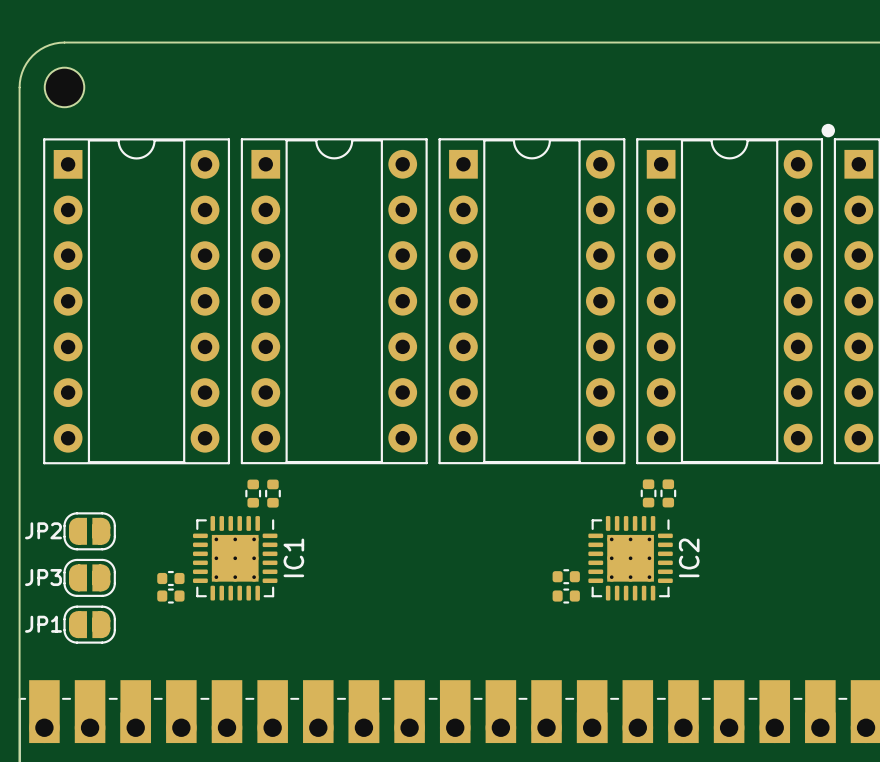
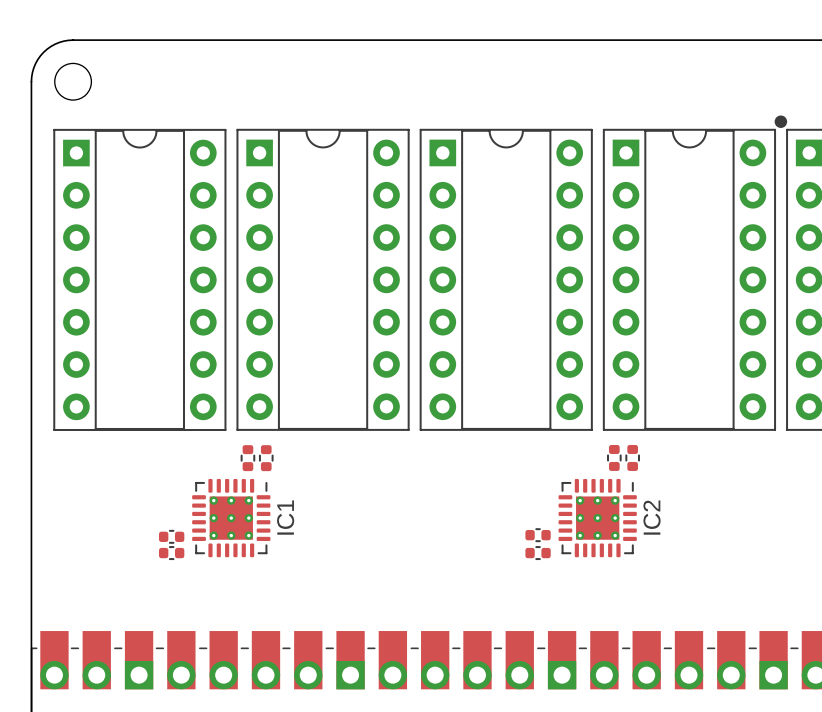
JP2: (89, 531) -> none
JP3: (89, 577) -> none
JP1: (89, 624) -> none

